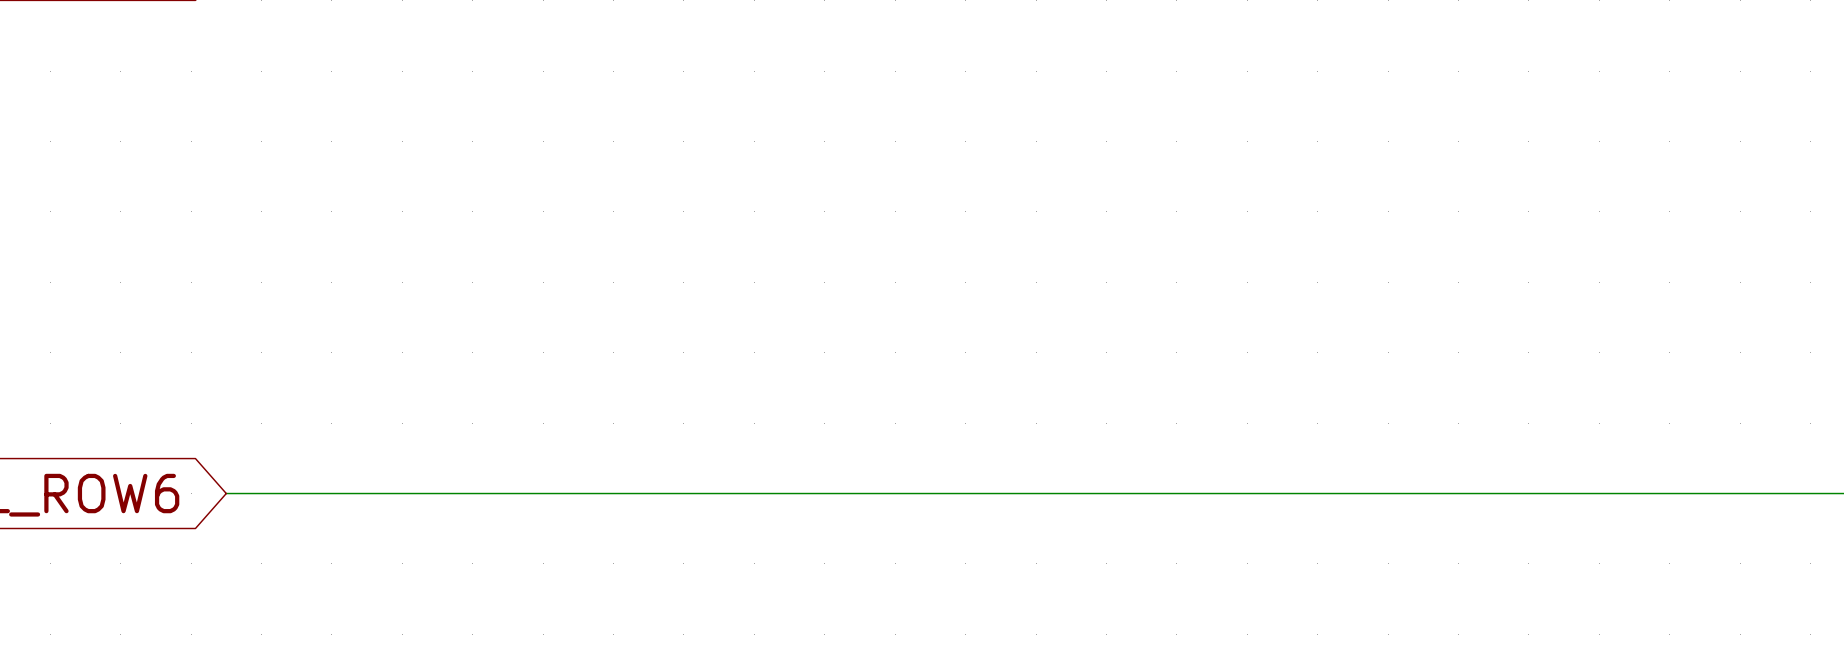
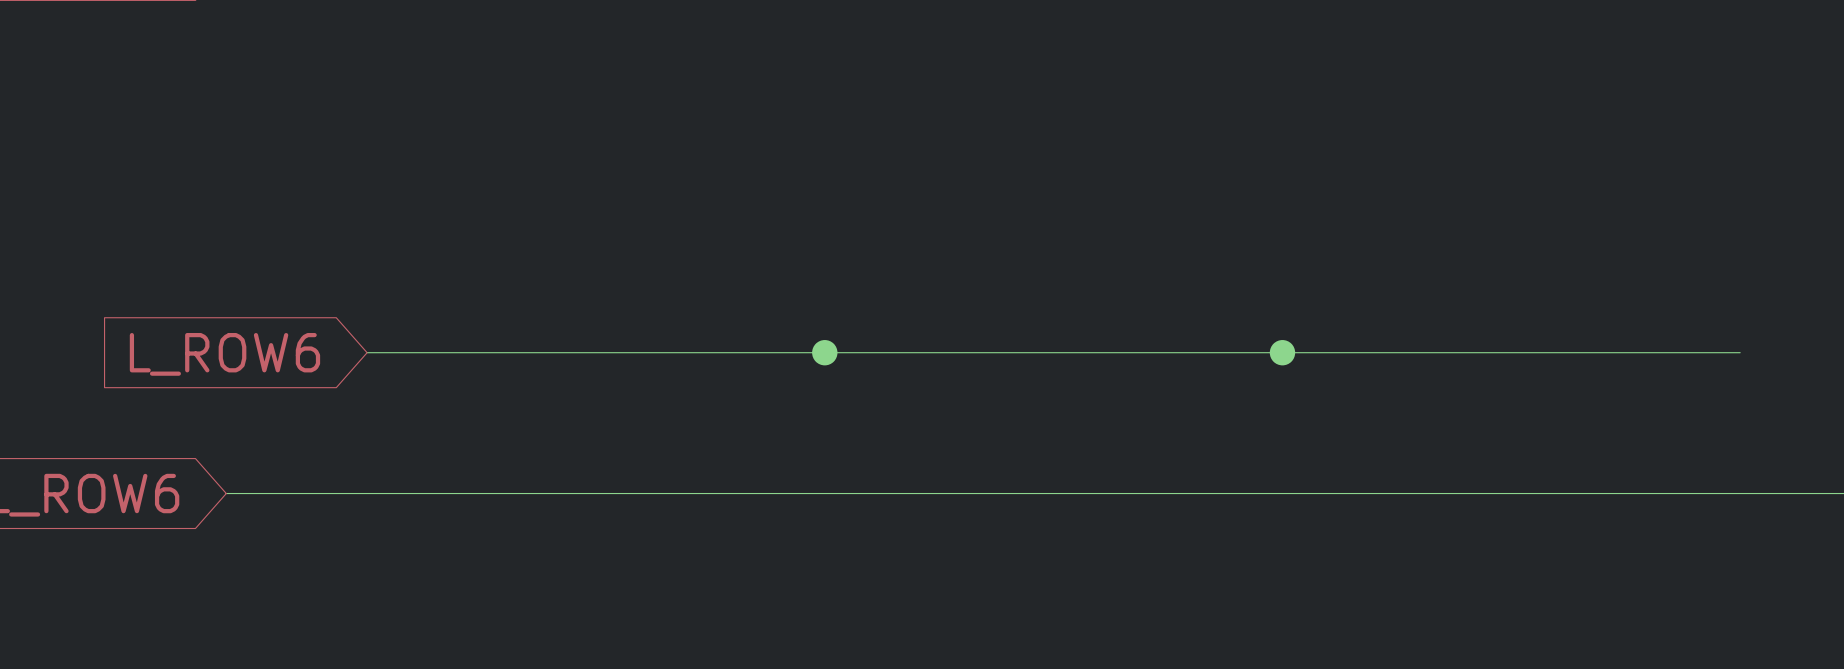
wire: none -> (367, 352) (1740, 352)
junction: none -> (824, 352)
junction: none -> (1282, 352)
global label: none -> L_ROW6 (224, 354)

